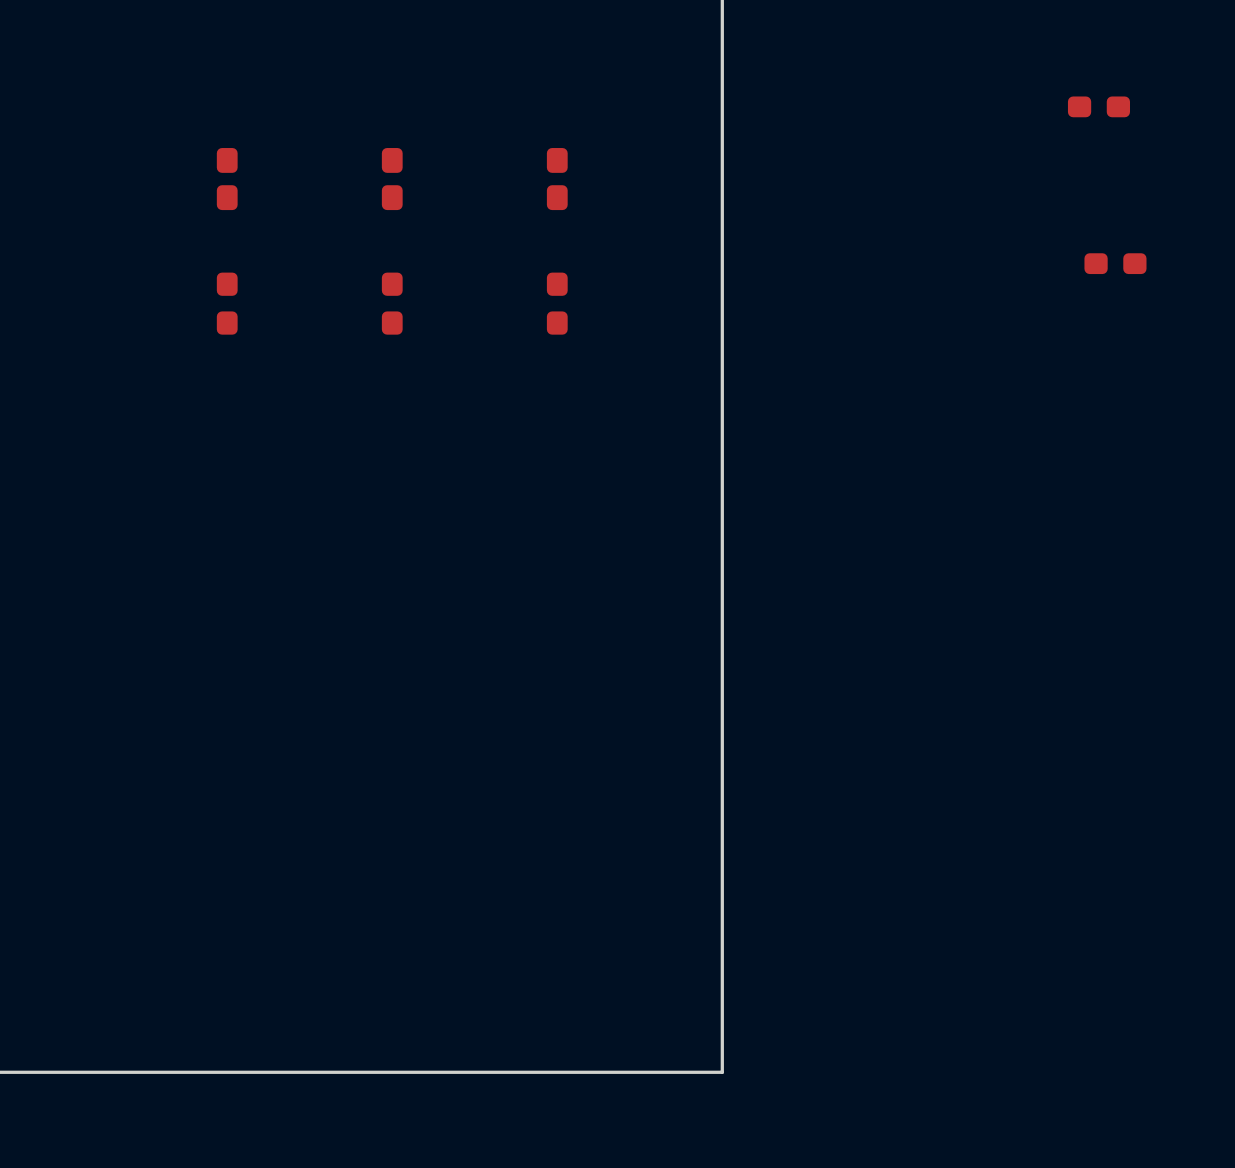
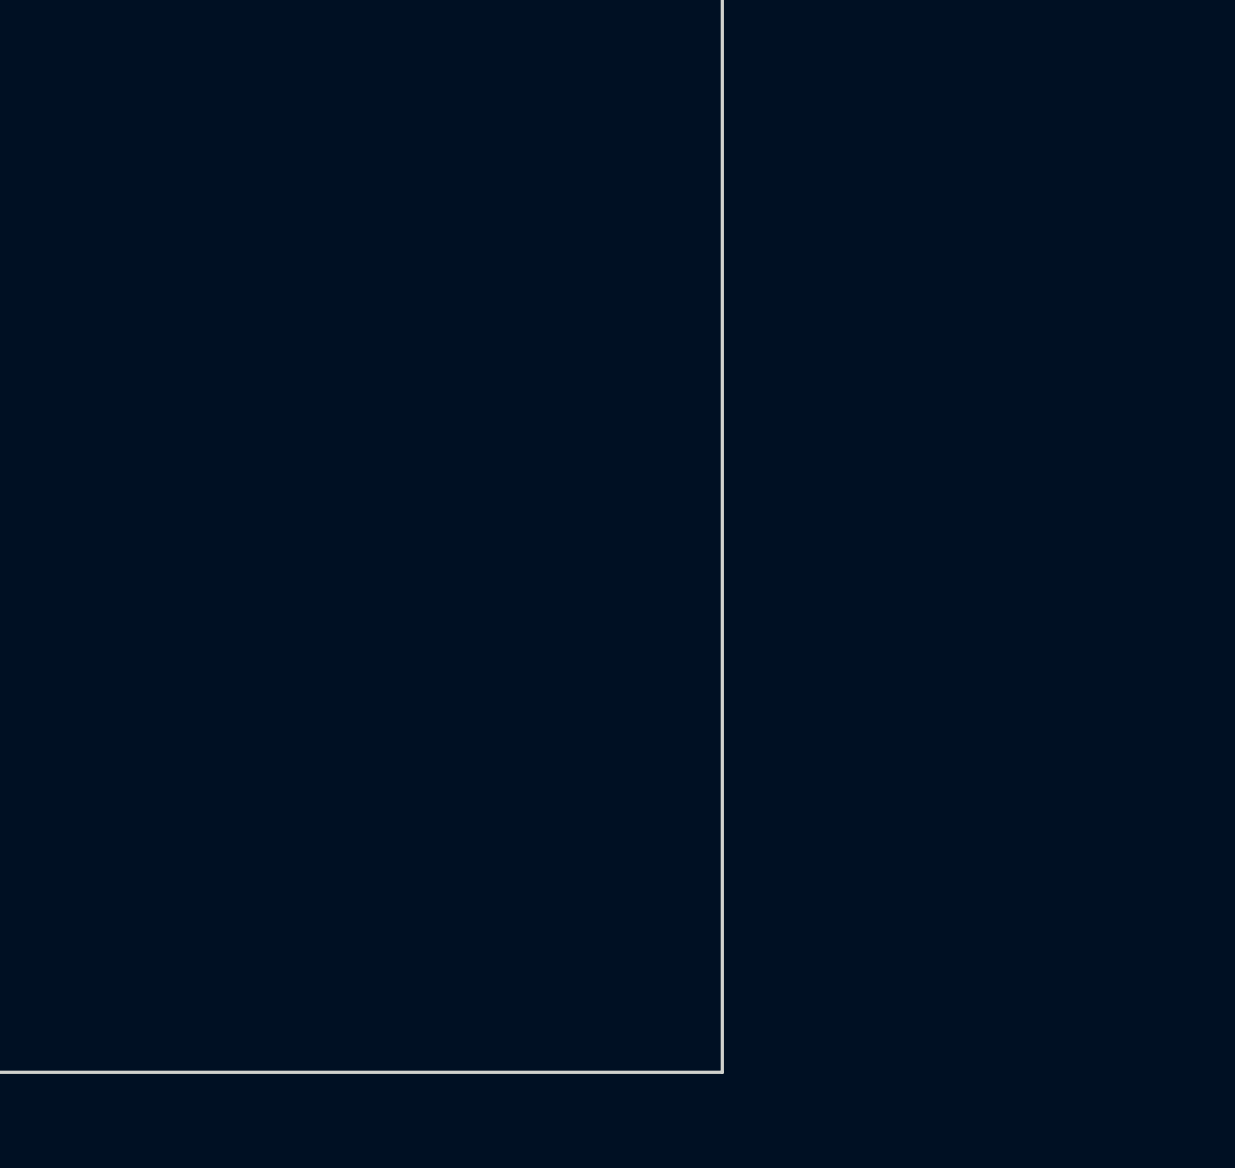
part: (1098, 106) -> none
part: (227, 179) -> none
part: (392, 179) -> none
part: (557, 179) -> none
part: (1115, 263) -> none
part: (227, 303) -> none
part: (392, 303) -> none
part: (557, 303) -> none

